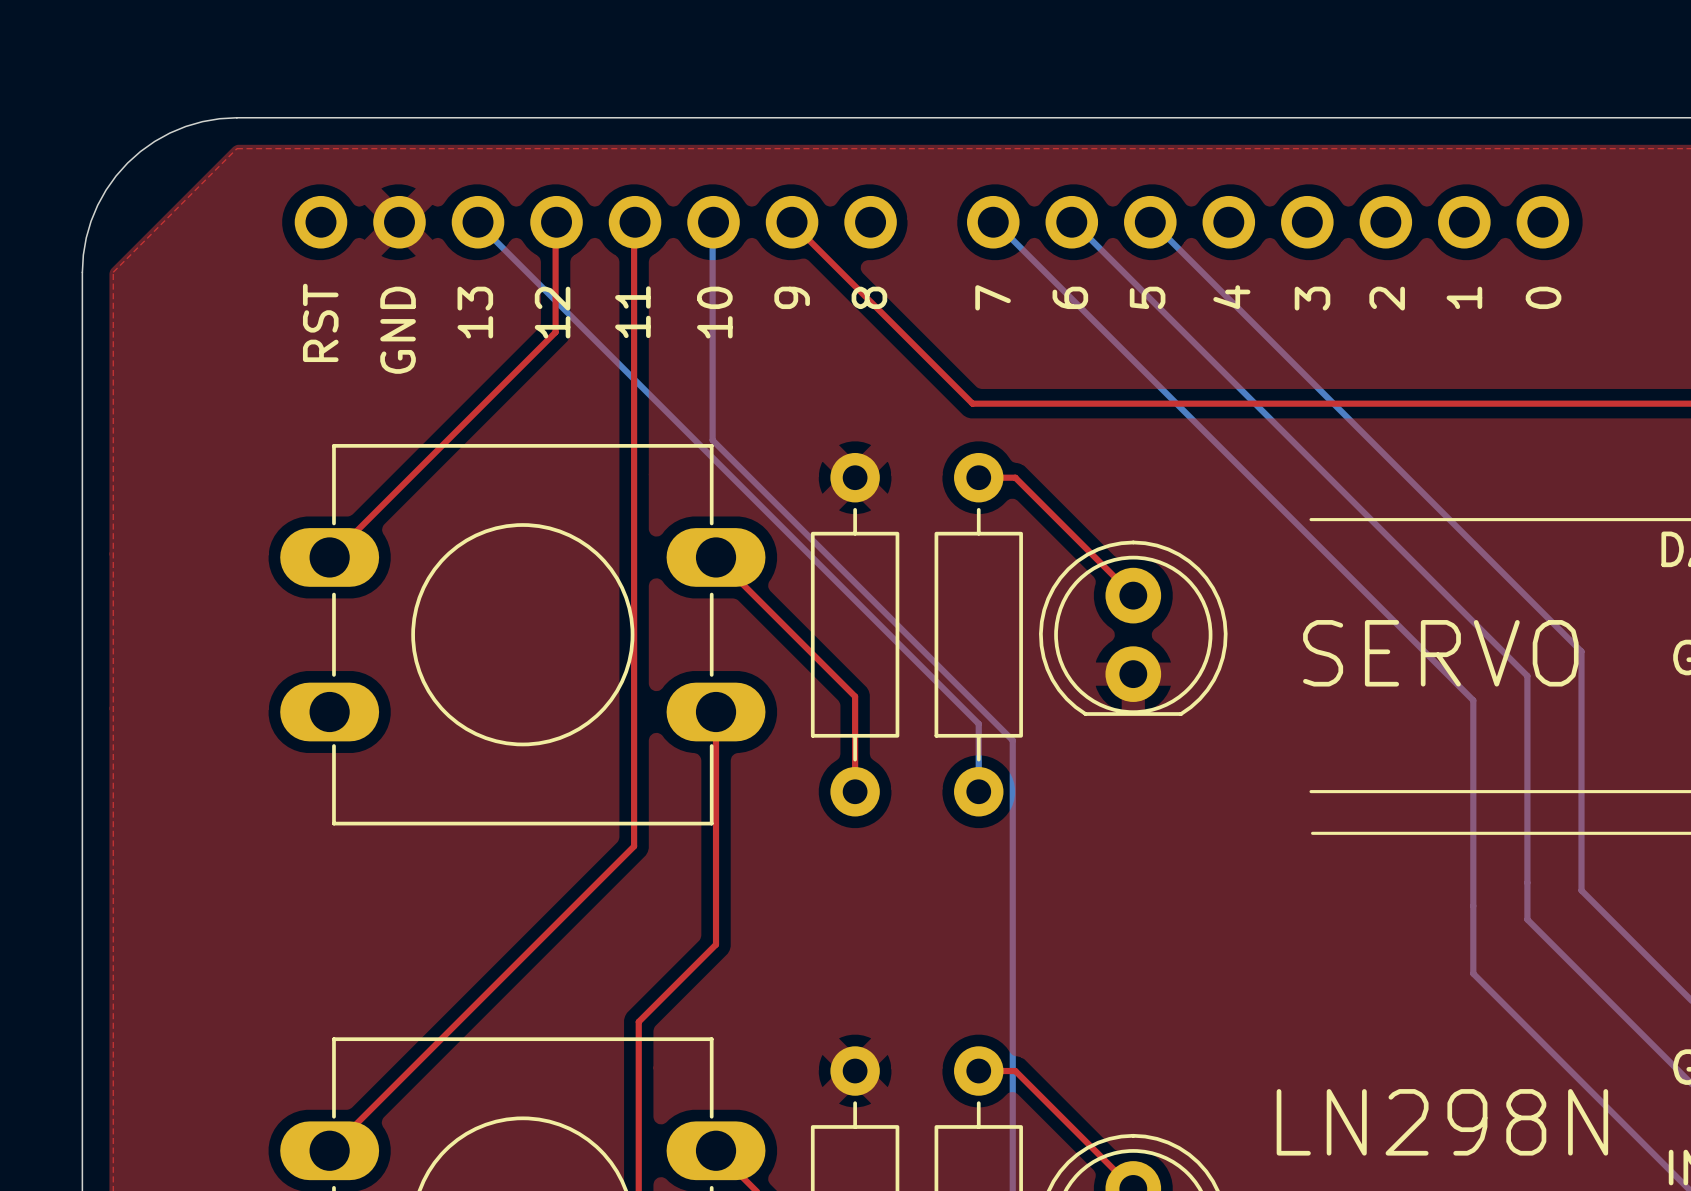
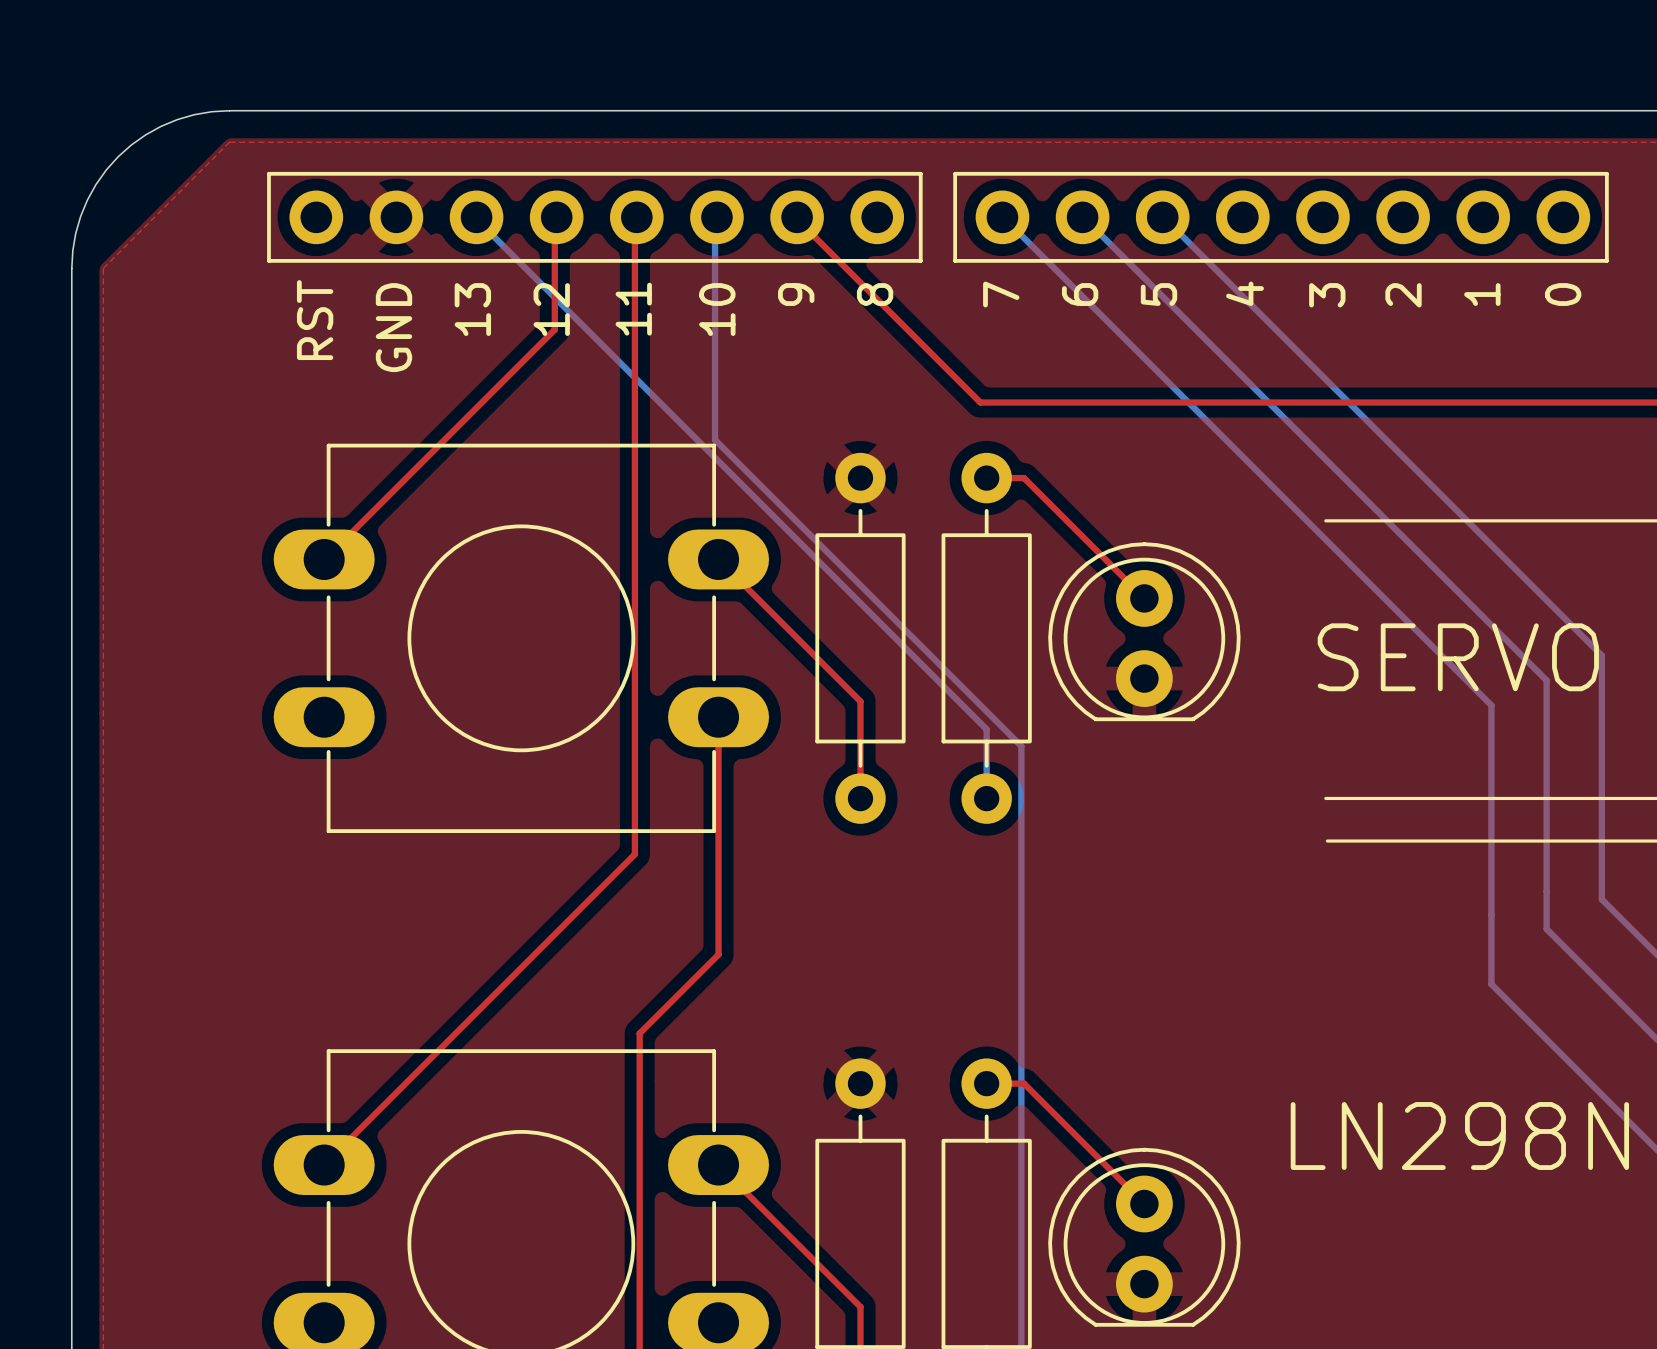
part side: bottom (595, 222) -> top (594, 217)
part side: bottom (1268, 222) -> top (1281, 217)

